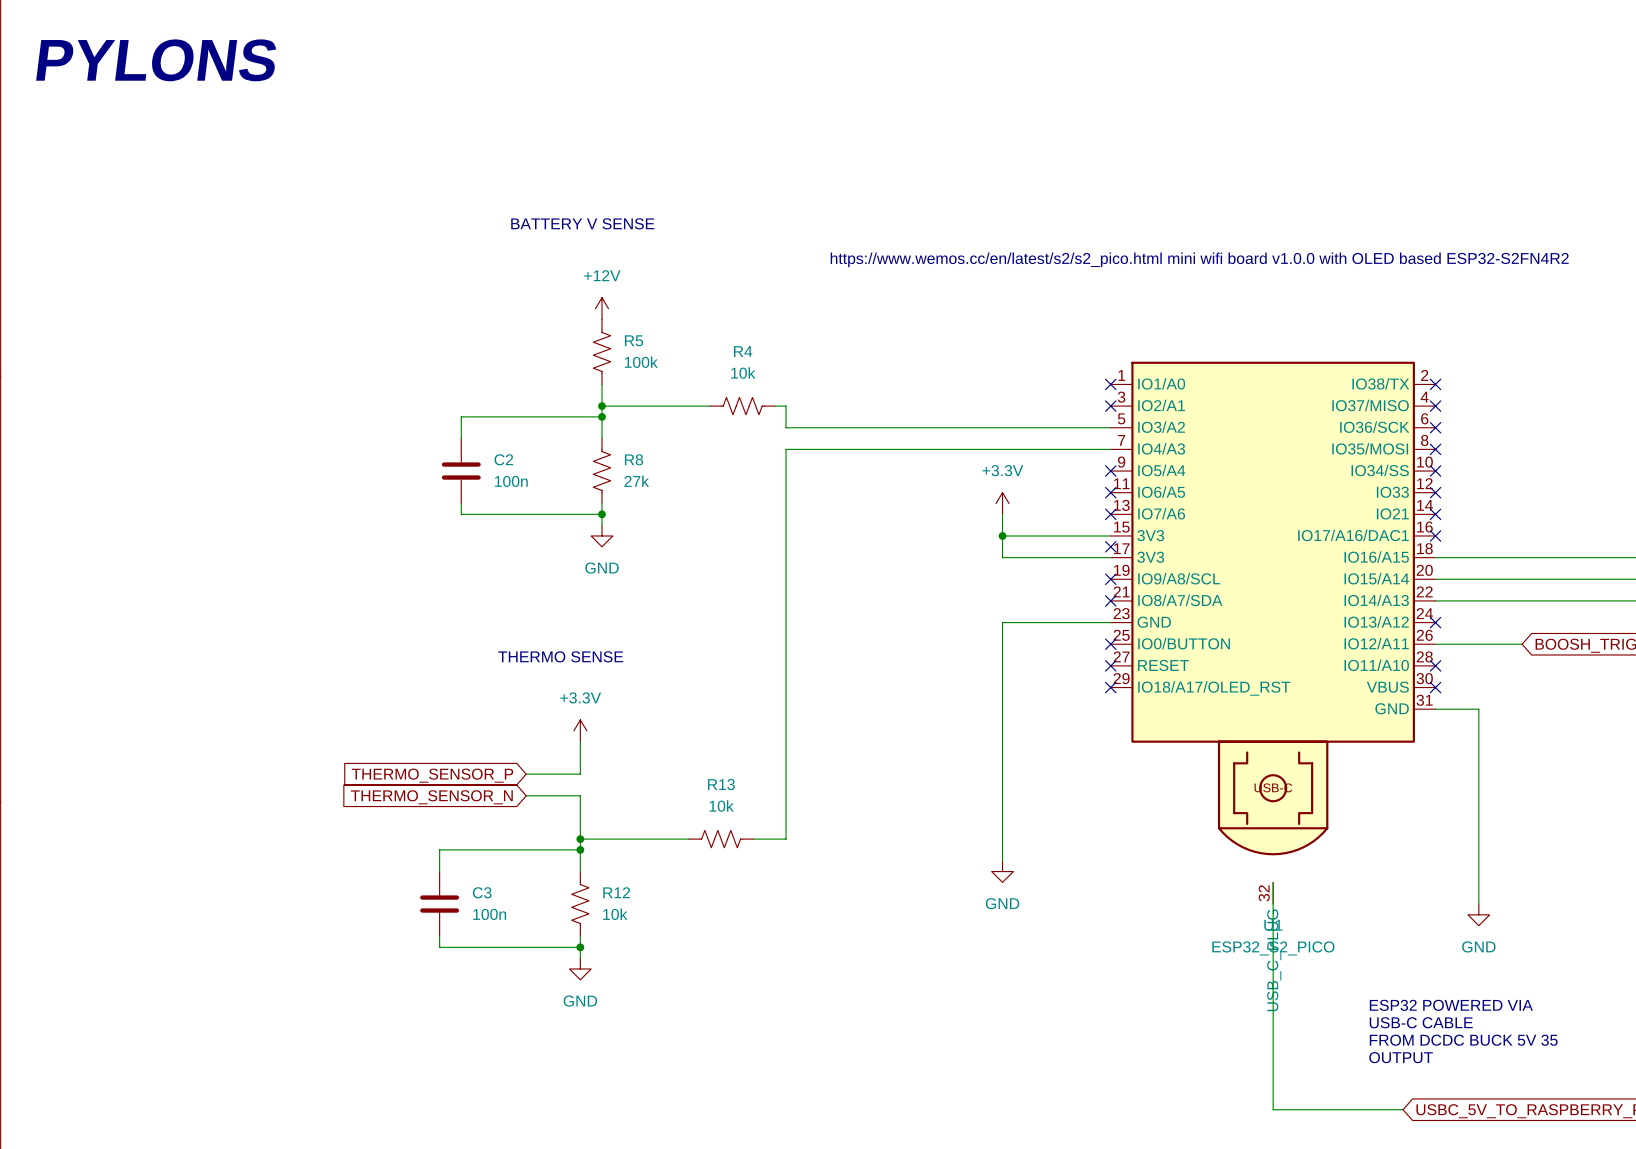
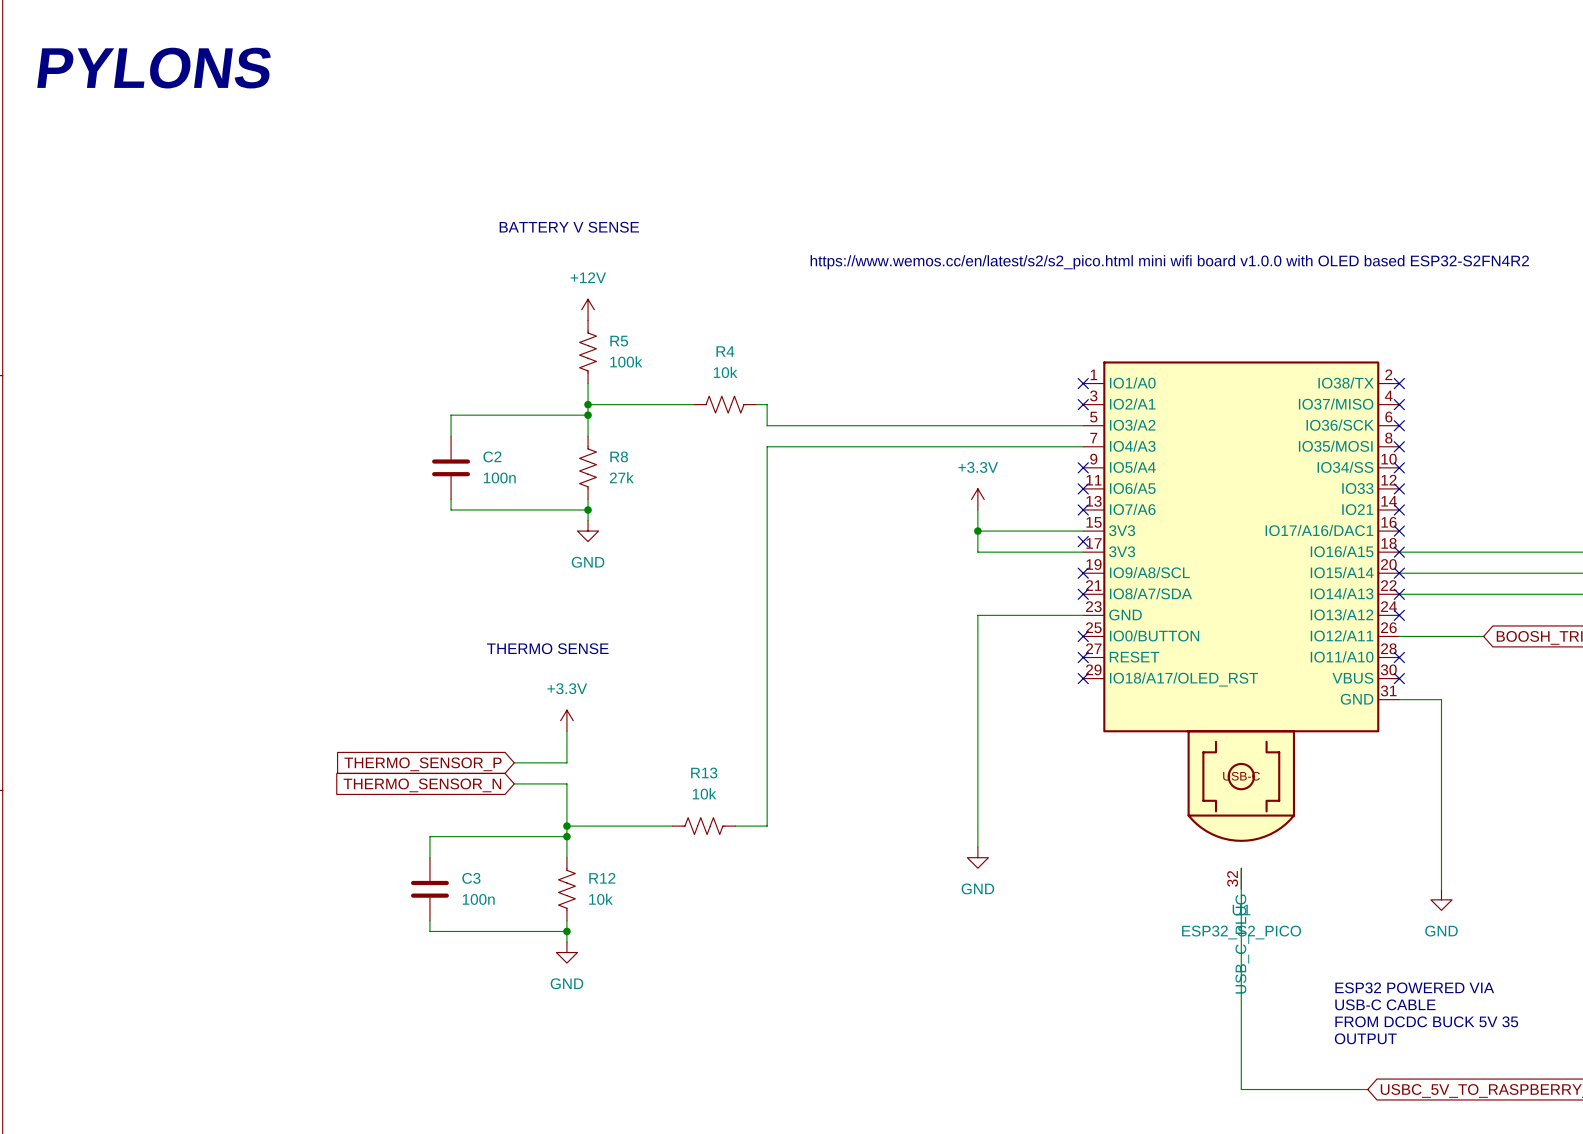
no-connect mark: none -> (1399, 552)
no-connect mark: none -> (1399, 573)
no-connect mark: none -> (1399, 594)

